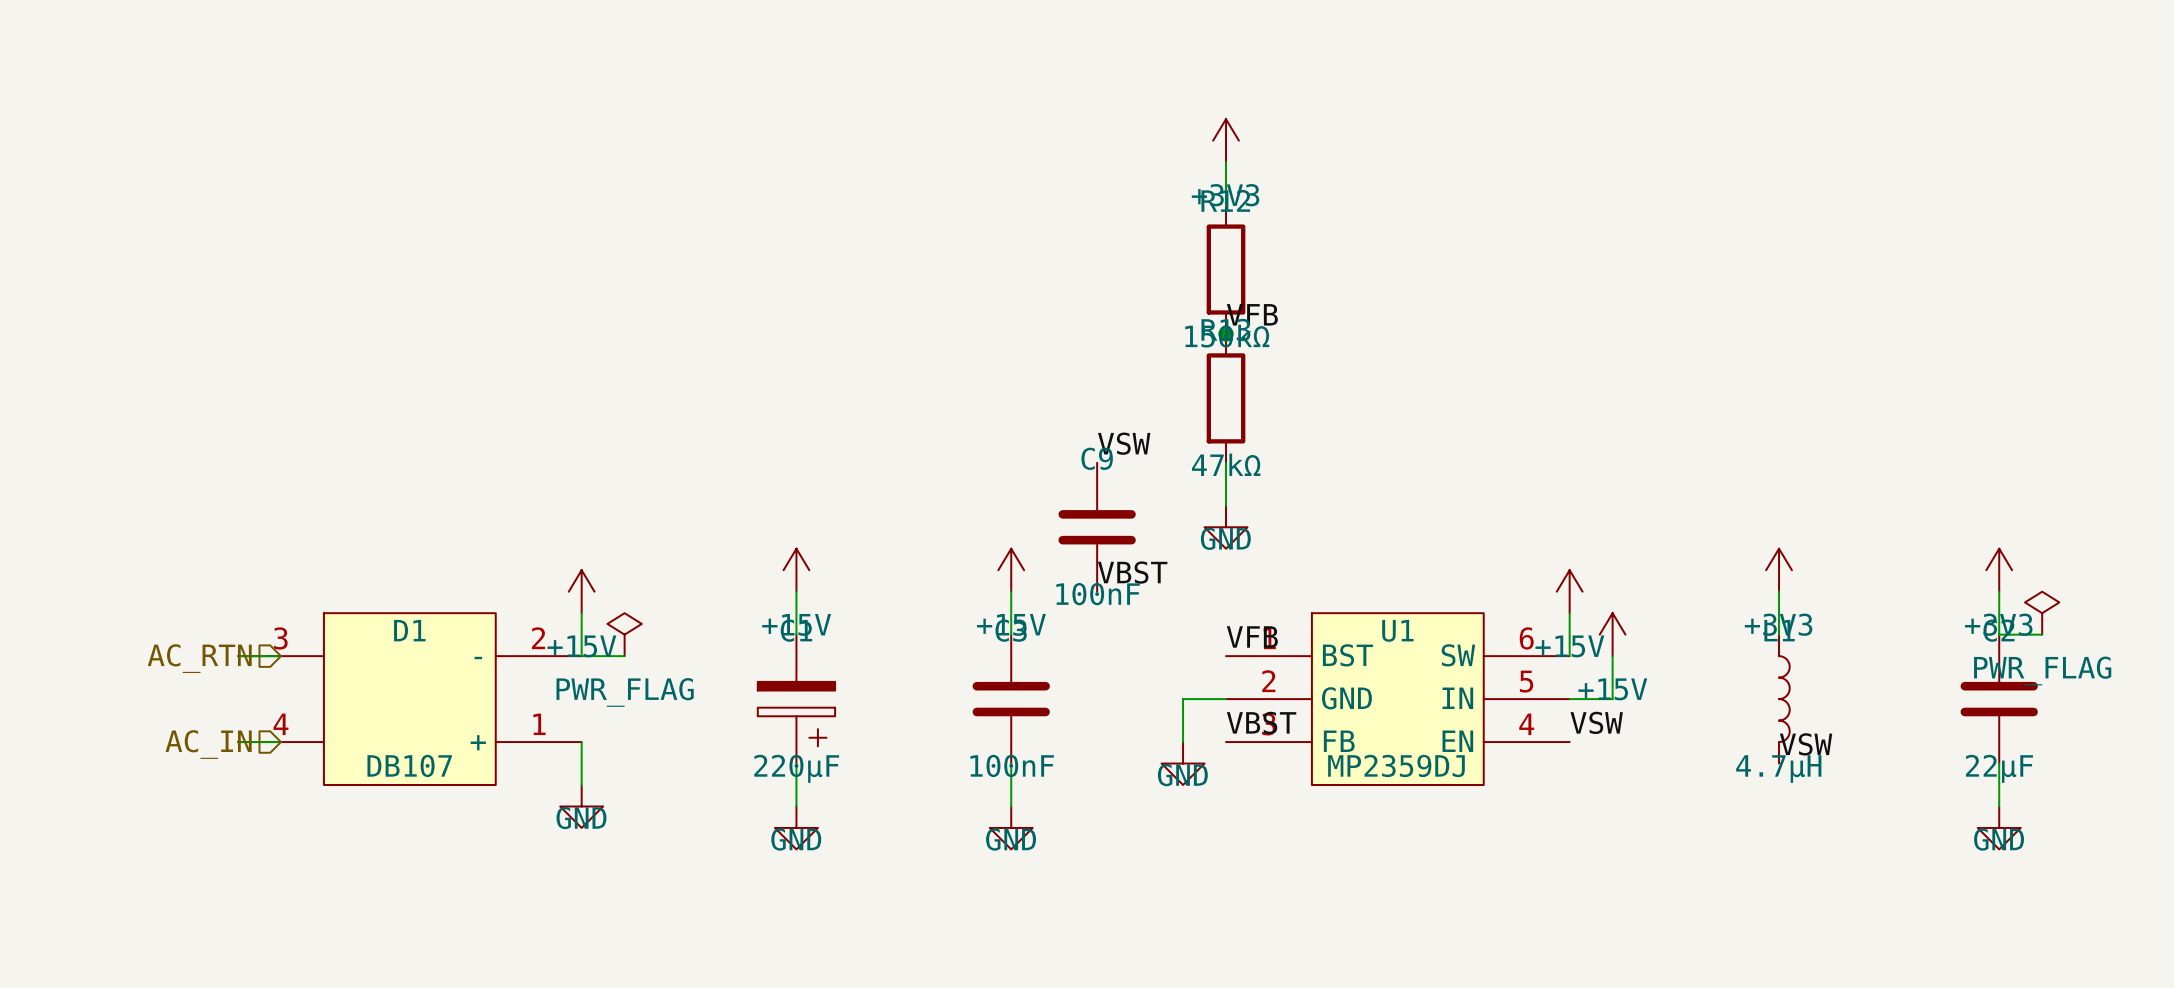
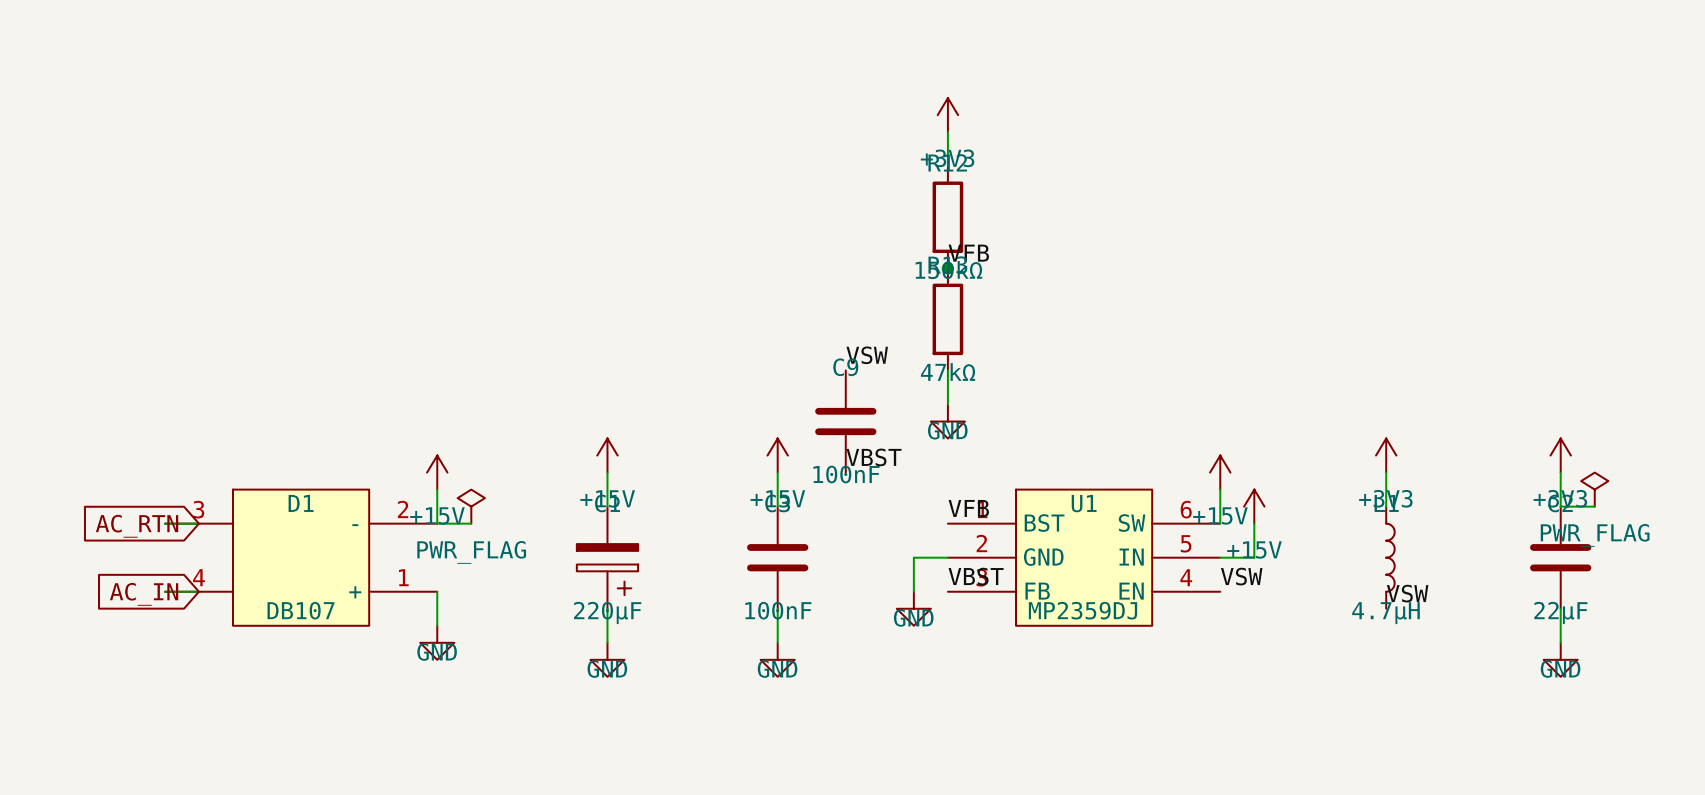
hierarchical label: AC_RTN (199, 658) -> none
global label: none -> AC_RTN (137, 526)
hierarchical label: AC_IN (208, 744) -> none
global label: none -> AC_IN (144, 594)

